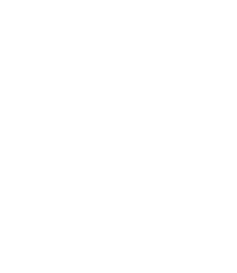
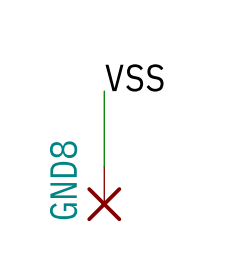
label: none -> VSS (134, 77)
wire: none -> (104, 91) (104, 166)
GND8: none -> (104, 193)

